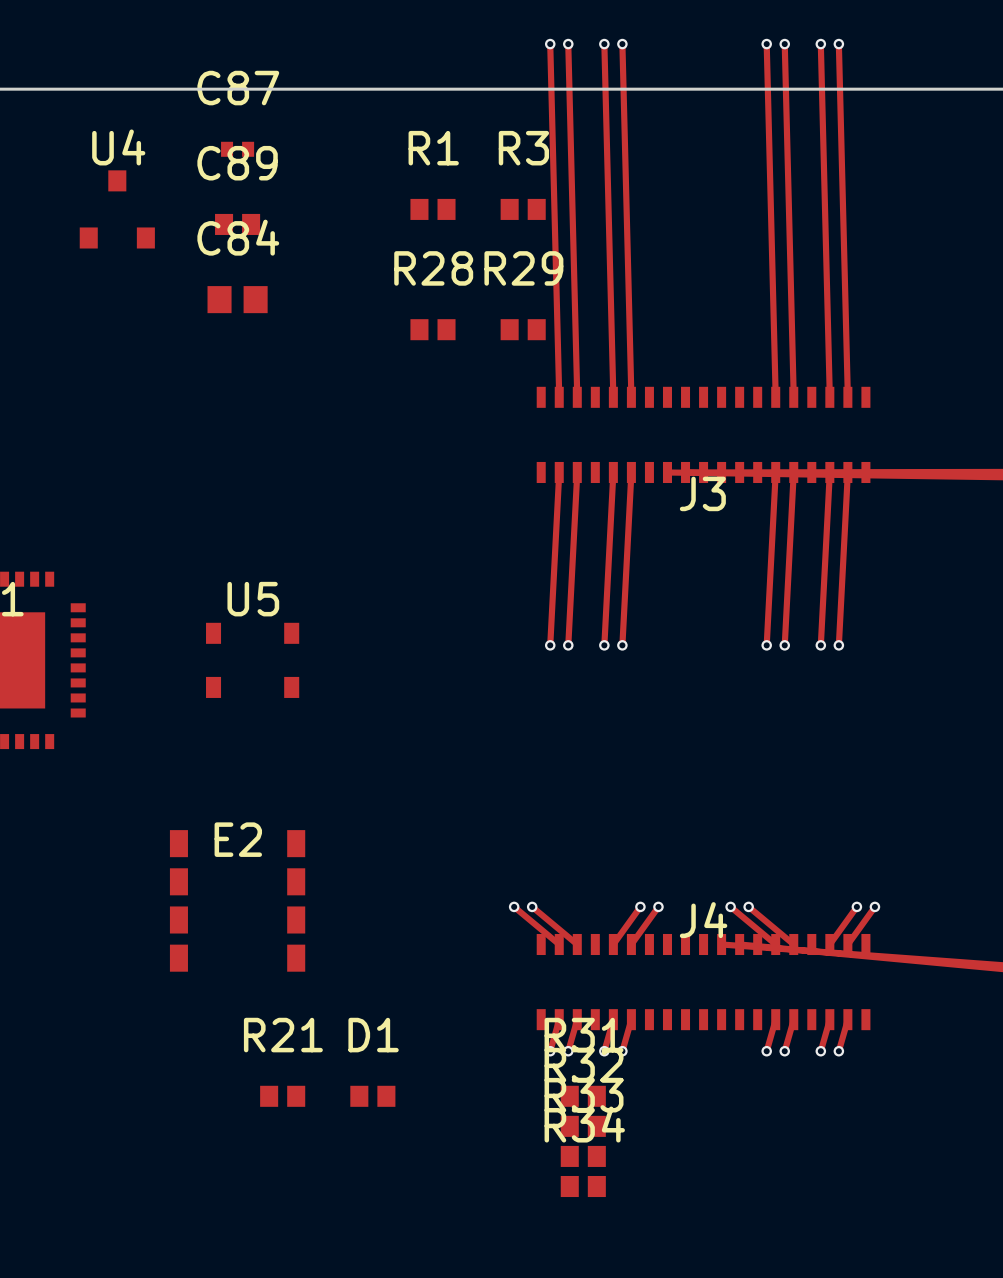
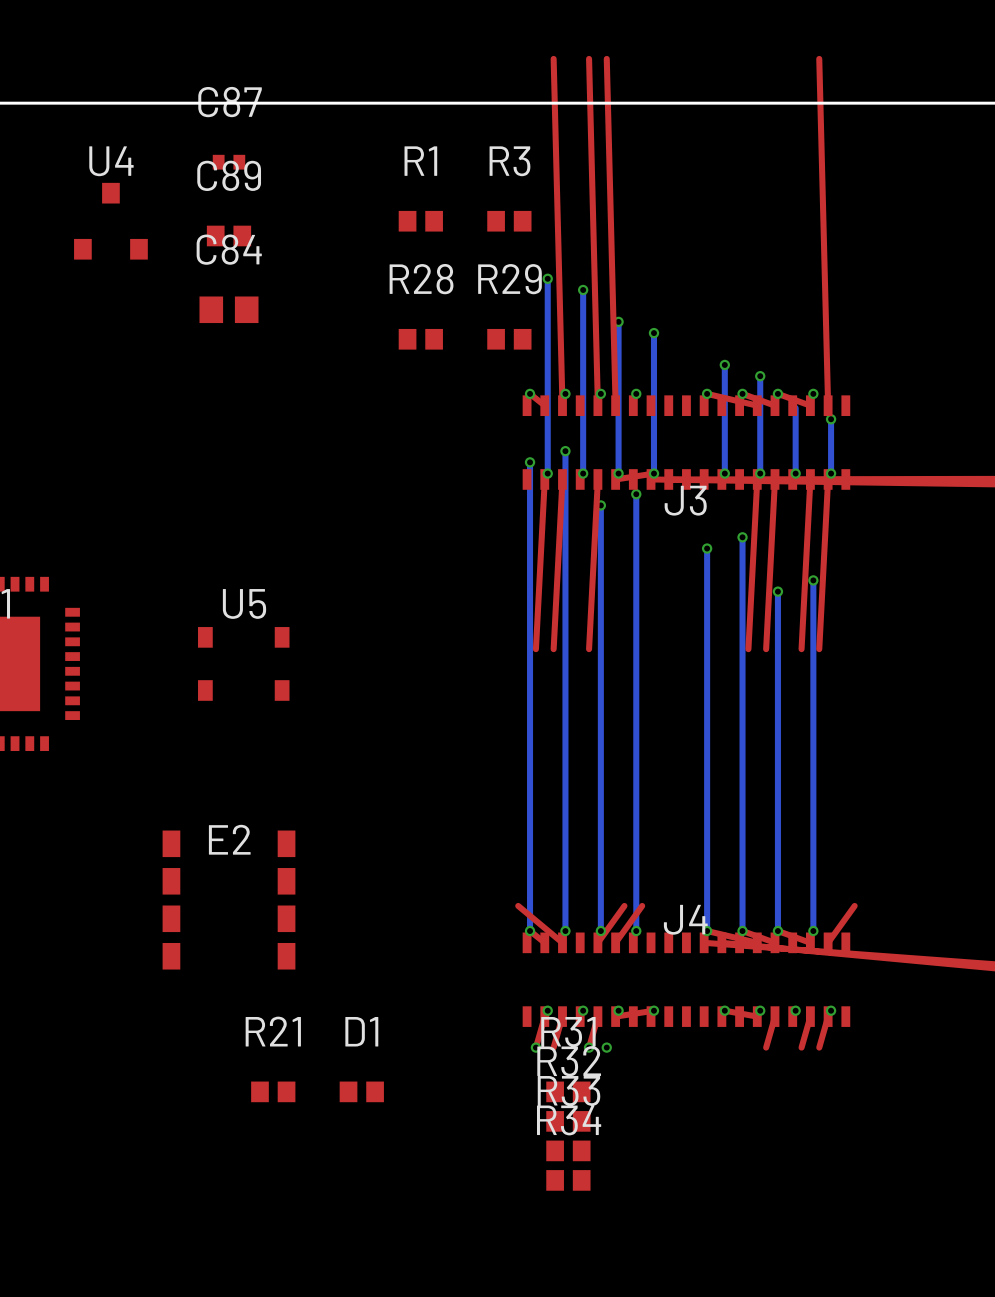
top track: (550, 44) (559, 397) -> (530, 393) (544, 405)
via: (550, 44) -> none
via: (568, 44) -> none
via: (604, 44) -> none
via: (622, 44) -> none
top track: (766, 44) (775, 397) -> (707, 393) (757, 405)
via: (766, 44) -> none
top track: (784, 44) (793, 397) -> (742, 393) (774, 405)
via: (784, 44) -> none
top track: (820, 44) (829, 397) -> (777, 393) (810, 405)
via: (820, 44) -> none
via: (838, 44) -> none
bottom track: none -> (547, 278) (547, 473)
via: none -> (547, 278)
bottom track: none -> (583, 289) (583, 473)
via: none -> (583, 289)
bottom track: none -> (618, 321) (618, 473)
via: none -> (618, 321)
bottom track: none -> (653, 333) (653, 473)
via: none -> (653, 333)
bottom track: none -> (724, 364) (724, 473)
via: none -> (724, 364)
bottom track: none -> (760, 376) (760, 473)
via: none -> (760, 376)
via: none -> (530, 393)
via: none -> (565, 393)
via: none -> (600, 393)
via: none -> (636, 393)
via: none -> (707, 393)
via: none -> (742, 393)
via: none -> (777, 393)
via: none -> (813, 393)
bottom track: none -> (795, 408) (795, 473)
bottom track: none -> (831, 419) (831, 473)
via: none -> (831, 419)
bottom track: none -> (565, 451) (565, 931)
via: none -> (565, 451)
bottom track: none -> (530, 462) (530, 931)
via: none -> (530, 462)
via: none -> (547, 473)
via: none -> (583, 473)
via: none -> (618, 473)
via: none -> (653, 473)
via: none -> (724, 473)
via: none -> (760, 473)
via: none -> (795, 473)
via: none -> (831, 473)
top track: (631, 472) (622, 645) -> (615, 479) (653, 473)
bottom track: none -> (636, 494) (636, 931)
via: none -> (636, 494)
bottom track: none -> (600, 505) (600, 931)
via: none -> (600, 505)
bottom track: none -> (742, 537) (742, 931)
via: none -> (742, 537)
bottom track: none -> (707, 548) (707, 931)
via: none -> (707, 548)
bottom track: none -> (813, 580) (813, 931)
via: none -> (813, 580)
bottom track: none -> (777, 591) (777, 931)
via: none -> (777, 591)
via: (550, 645) -> none
via: (568, 645) -> none
via: (604, 645) -> none
via: (622, 645) -> none
via: (766, 645) -> none
via: (784, 645) -> none
via: (820, 645) -> none
via: (838, 645) -> none
top track: (514, 906) (559, 944) -> (530, 931) (544, 942)
via: (514, 906) -> none
via: (532, 906) -> none
via: (640, 906) -> none
via: (658, 906) -> none
top track: (730, 906) (775, 944) -> (707, 931) (757, 942)
via: (730, 906) -> none
top track: (748, 906) (793, 944) -> (742, 931) (774, 942)
via: (748, 906) -> none
top track: (856, 906) (829, 944) -> (777, 931) (810, 942)
via: (856, 906) -> none
via: (874, 906) -> none
via: none -> (530, 931)
via: none -> (565, 931)
via: none -> (600, 931)
via: none -> (636, 931)
via: none -> (707, 931)
via: none -> (742, 931)
via: none -> (777, 931)
via: none -> (813, 931)
via: none -> (547, 1010)
via: none -> (583, 1010)
via: none -> (618, 1010)
via: none -> (653, 1010)
via: none -> (724, 1010)
via: none -> (760, 1010)
via: none -> (795, 1010)
via: none -> (831, 1010)
top track: (631, 1019) (622, 1051) -> (615, 1016) (653, 1010)
top track: (775, 1019) (766, 1051) -> (757, 1016) (724, 1010)
via: (568, 1051) -> none
via: (766, 1051) -> none
via: (784, 1051) -> none
via: (820, 1051) -> none
via: (838, 1051) -> none

